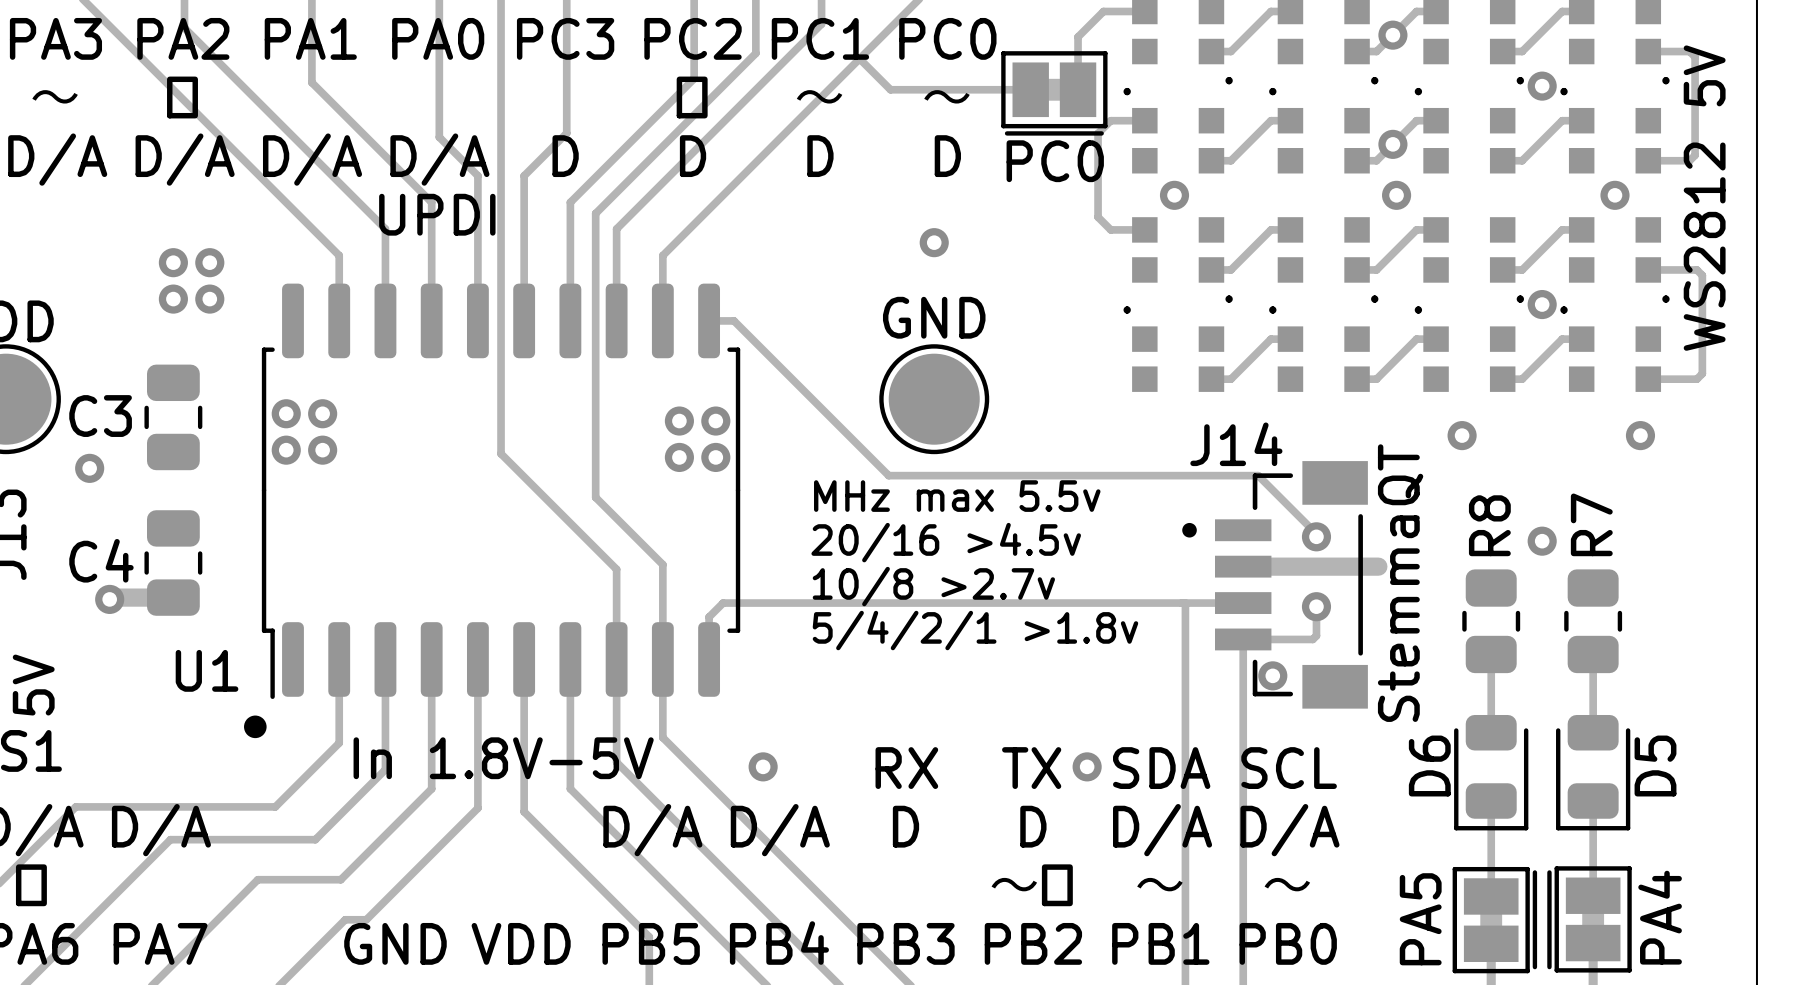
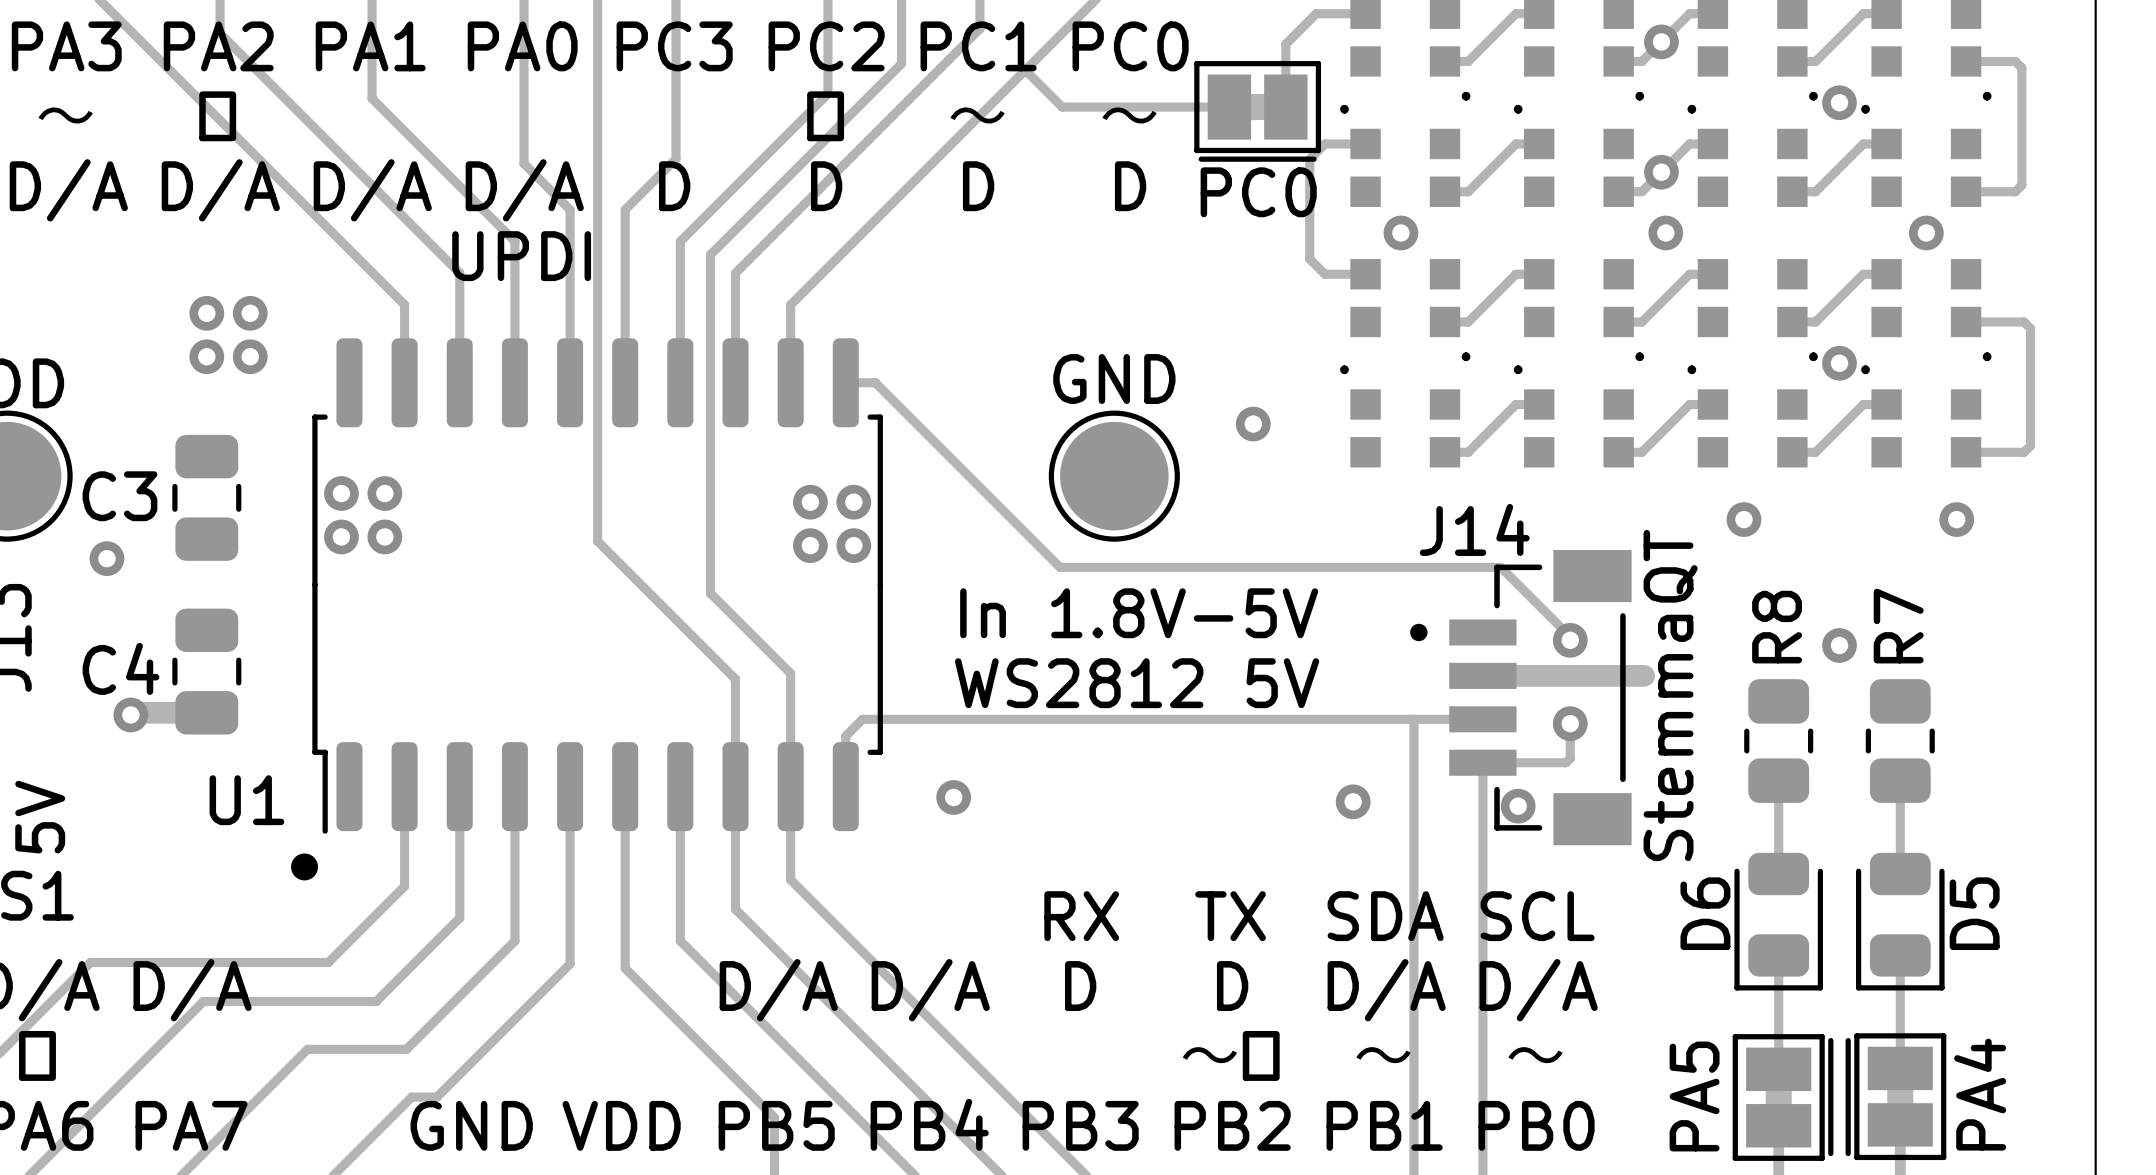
text rotation: 0° (1704, 198) -> 90° clockwise (1137, 683)
text position: WS2812 5V (1704, 198) -> WS2812 5V (1137, 683)
via position: (934, 242) -> (1253, 424)
text: MHz max 5.5v (957, 496) -> none
text: 20/16 >4.5v (946, 542) -> none
text: 10/8 >2.7v (933, 586) -> none
text: 5/4/2/1 >1.8v (975, 630) -> none
text position: In 1.8V-5V (503, 758) -> In 1.8V-5V (1139, 613)
via position: (763, 766) -> (953, 797)
via position: (1087, 766) -> (1353, 801)

